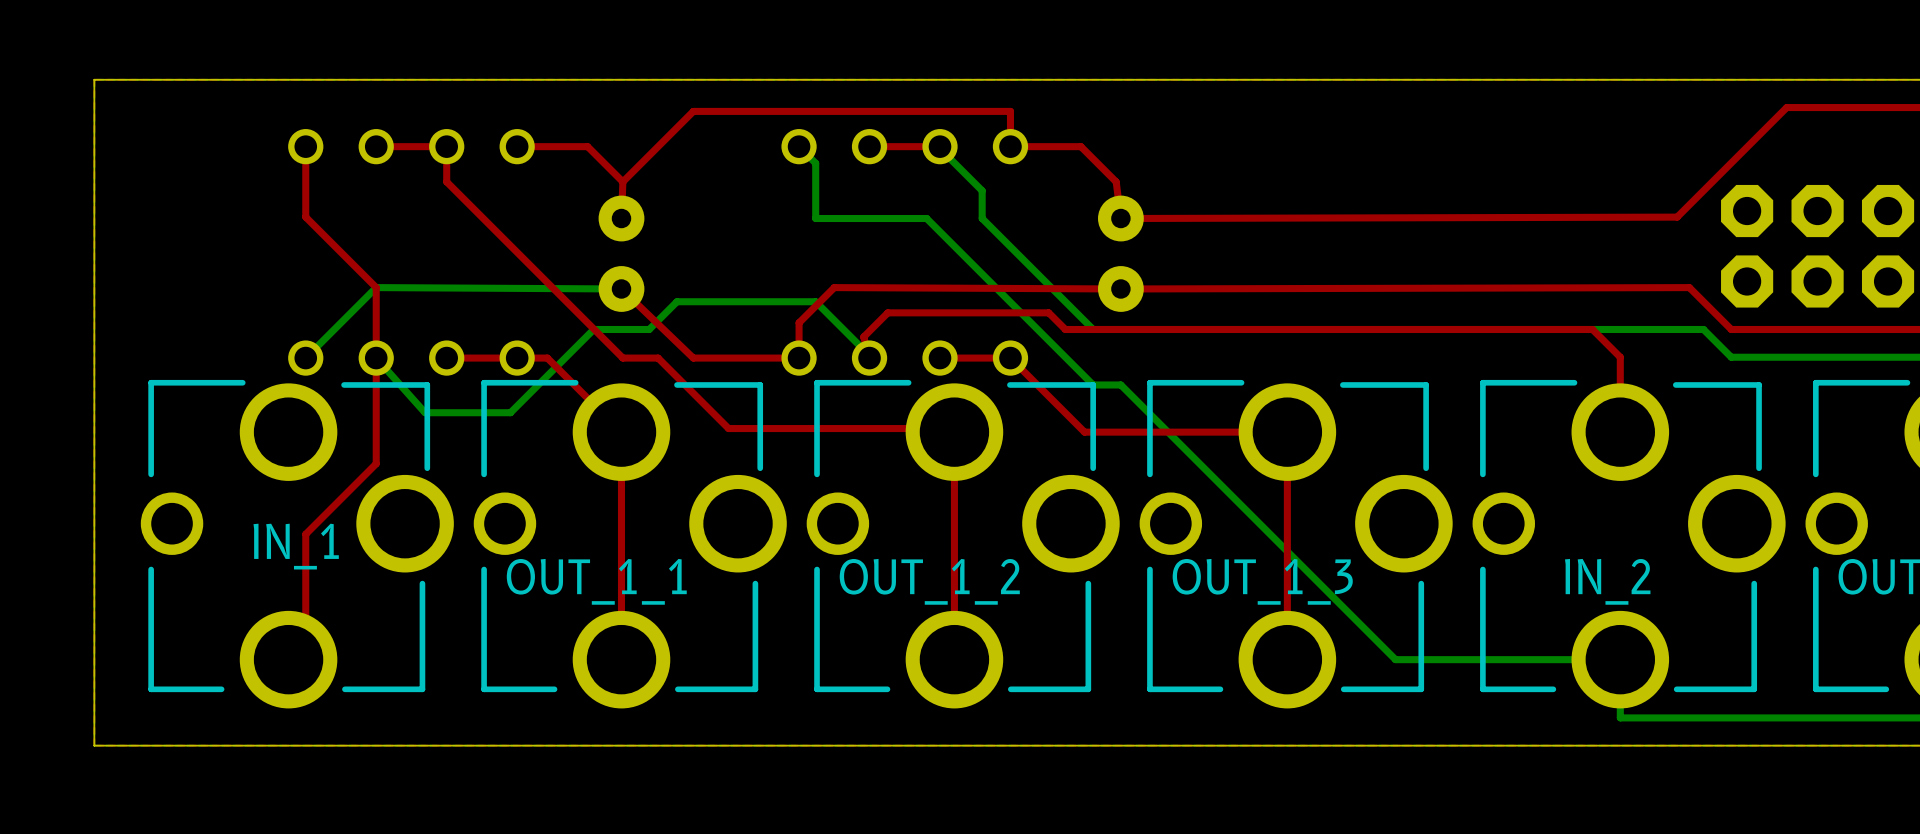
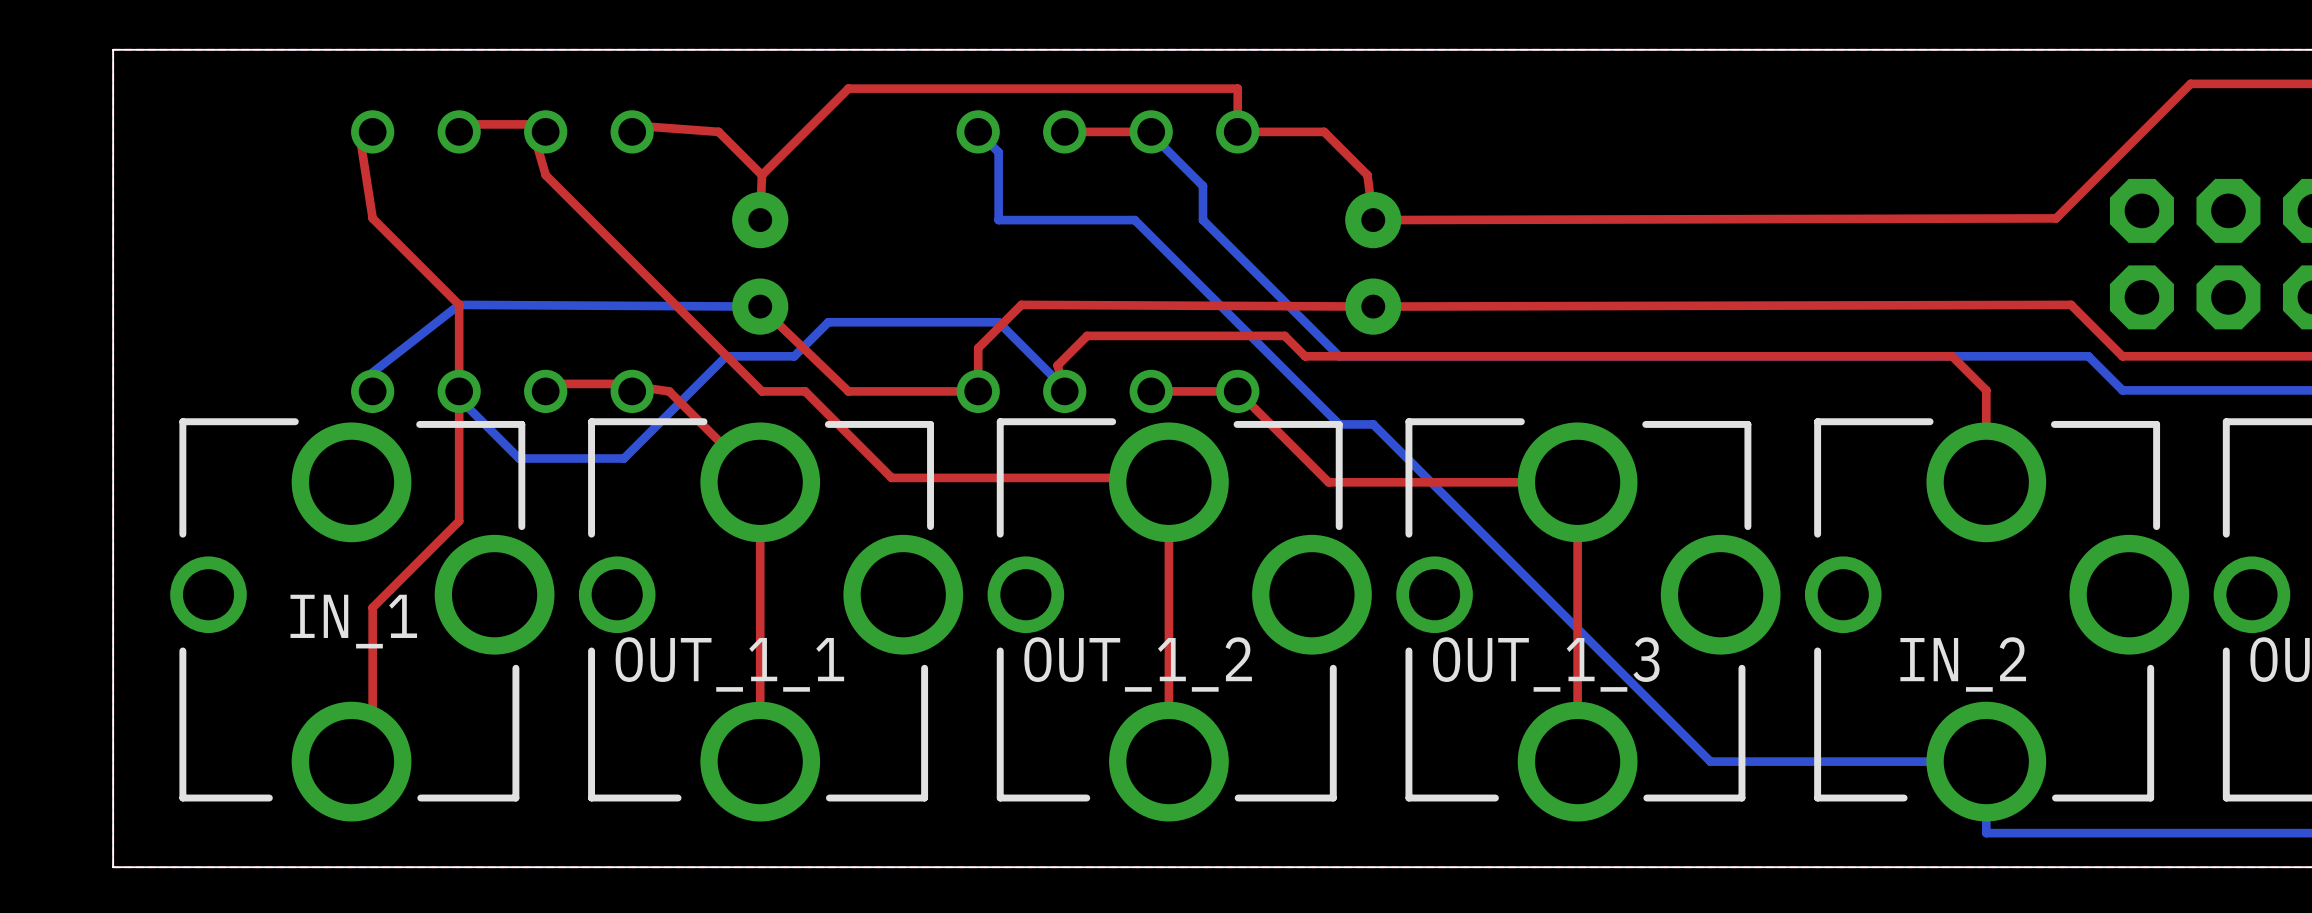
top track: (305, 146) (305, 217) -> (358, 124) (372, 218)
top track: (376, 146) (446, 146) (446, 181) -> (444, 124) (531, 124) (545, 175)
top track: (517, 146) (587, 146) -> (617, 124) (718, 131)
bottom track: (376, 287) (305, 358) -> (459, 304) (358, 383)
bottom track: (376, 358) (425, 412) -> (444, 383) (519, 458)
top track: (446, 358) (547, 358) -> (531, 383) (617, 383) (669, 391)

